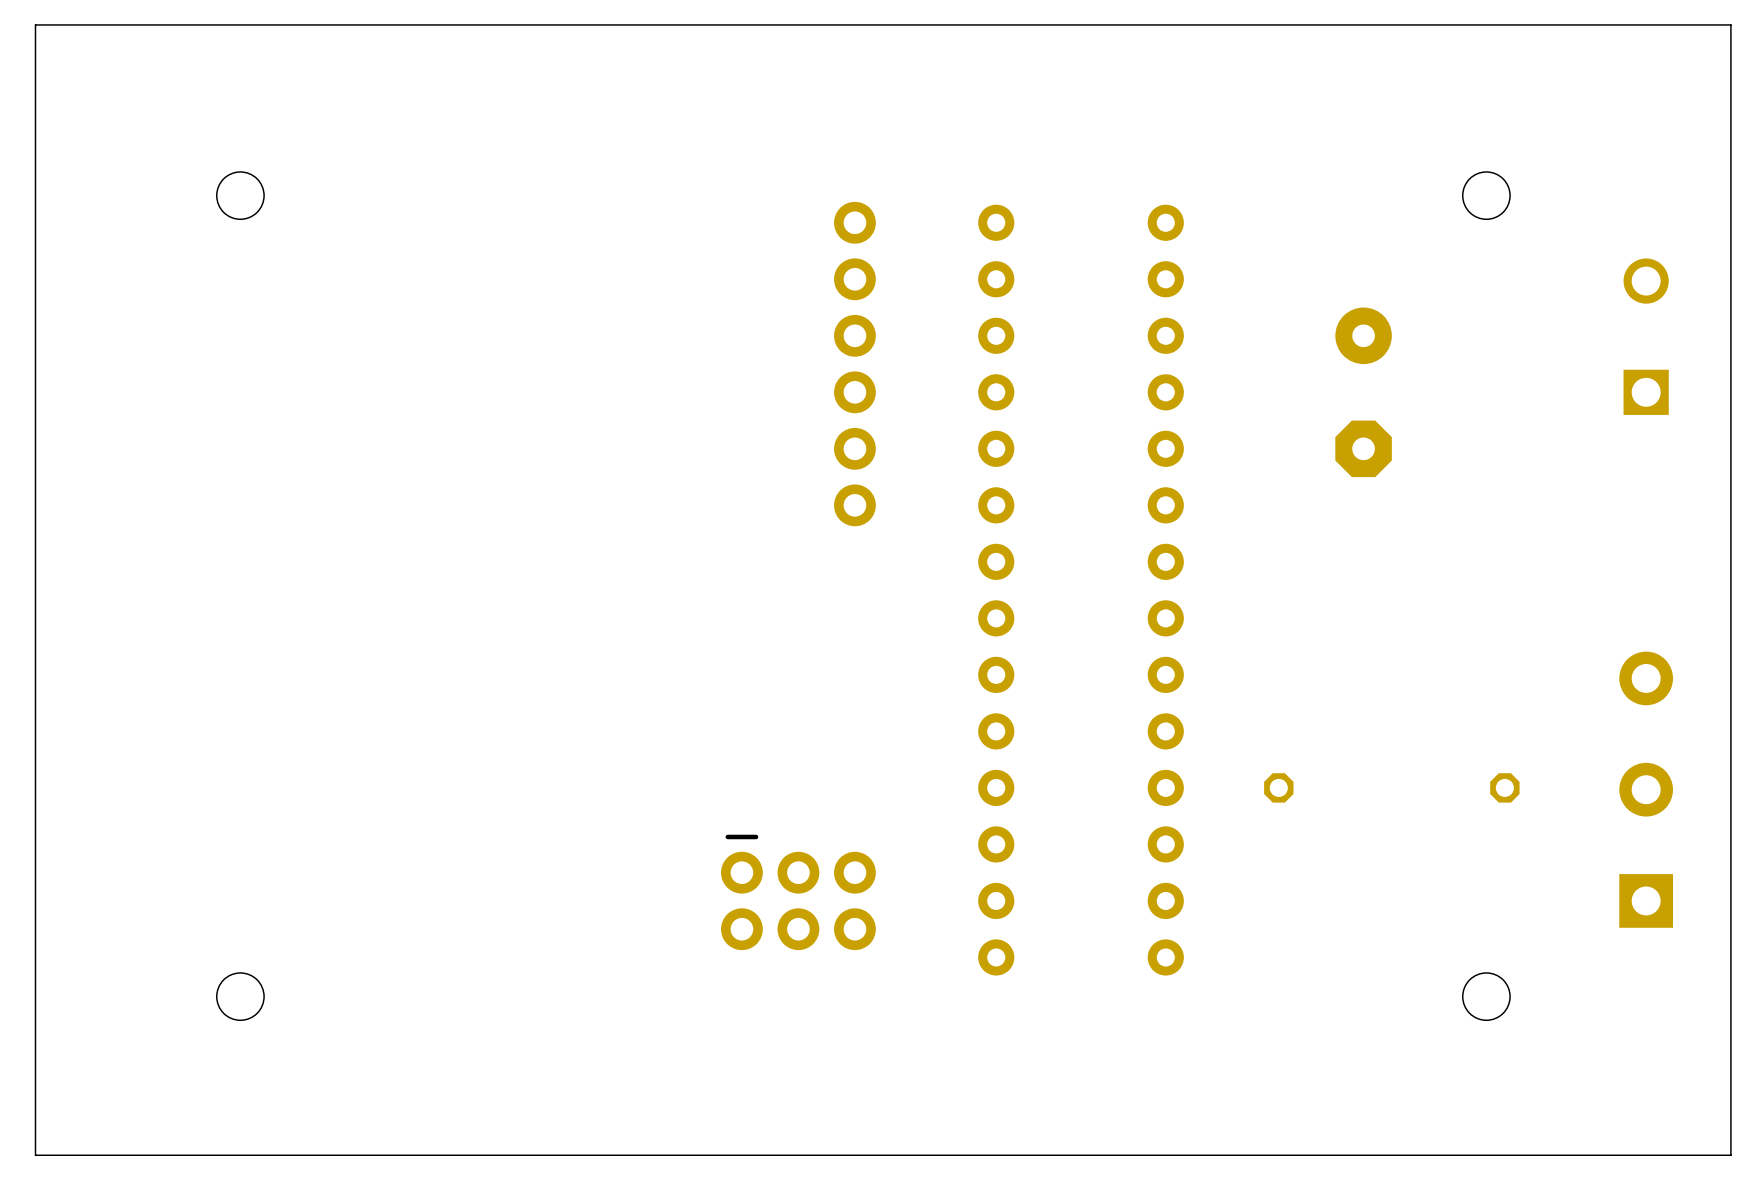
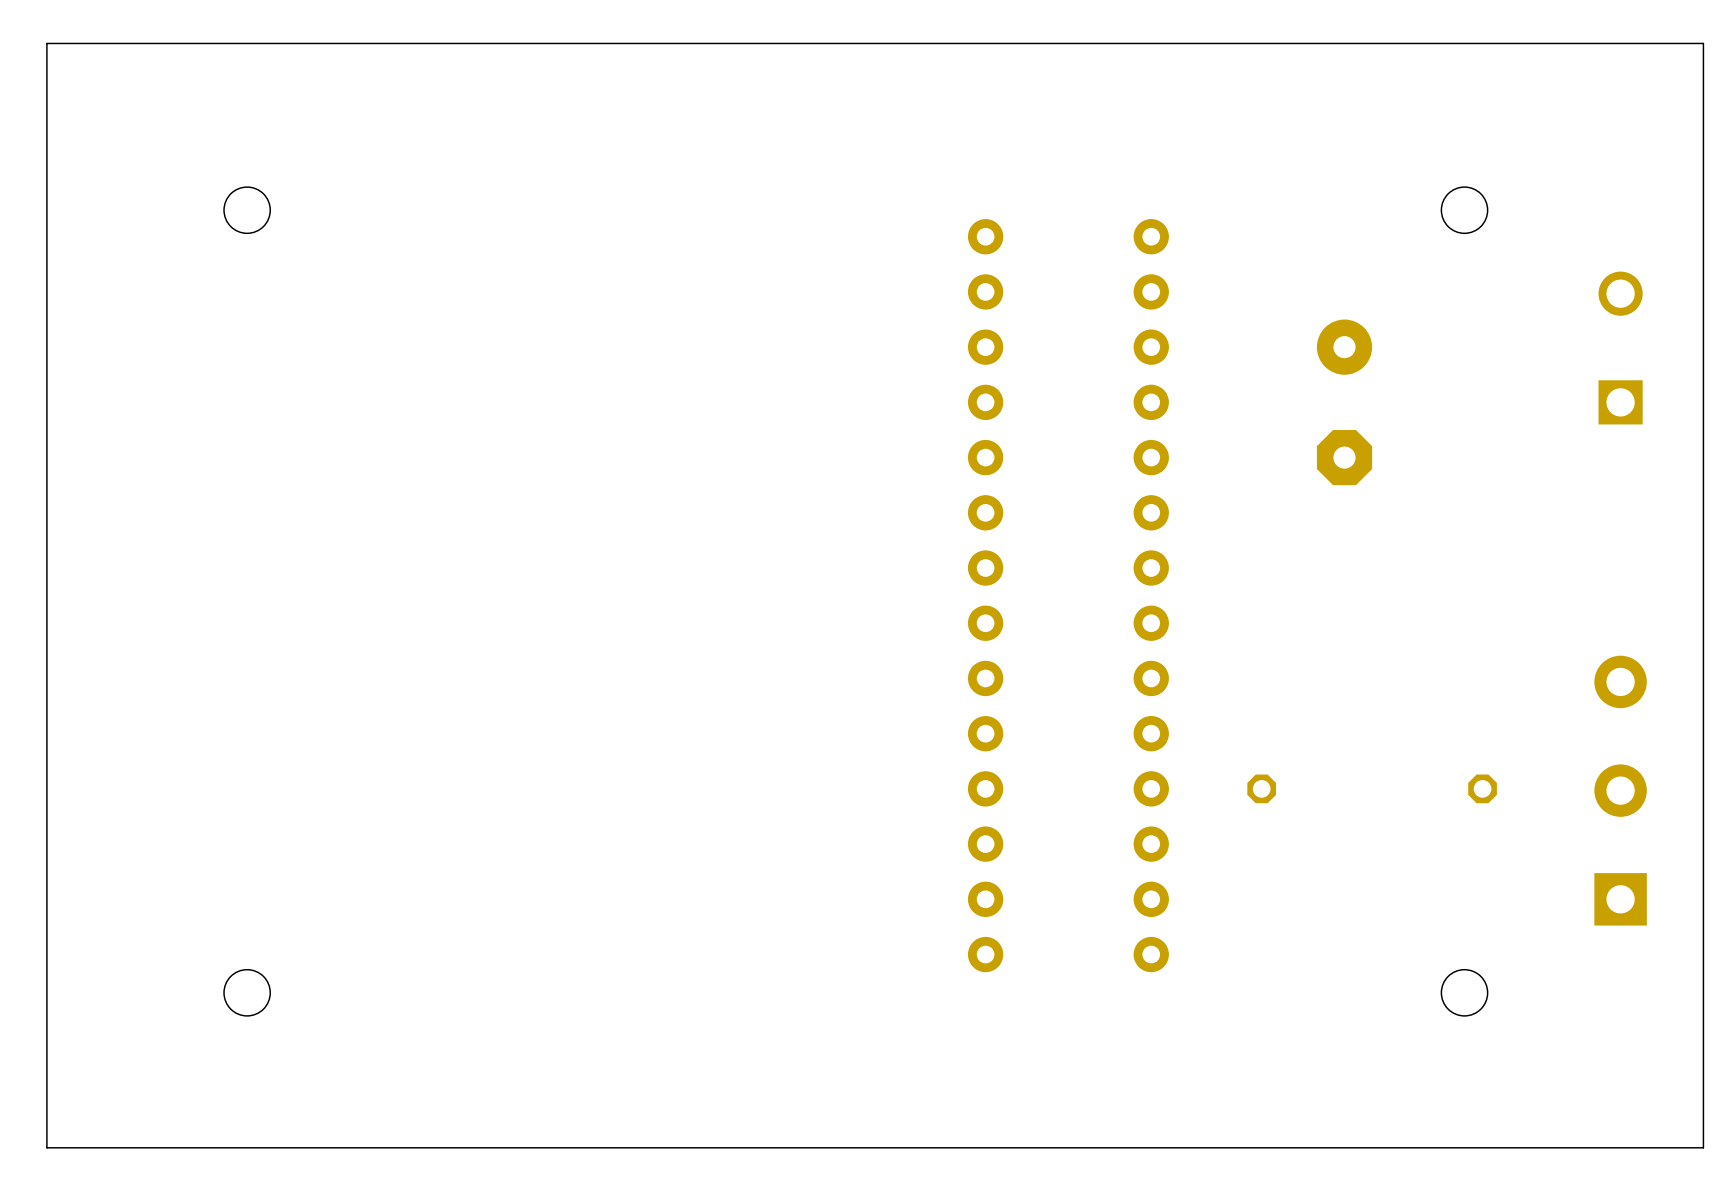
part: (854, 364) -> none
part: (798, 892) -> none

